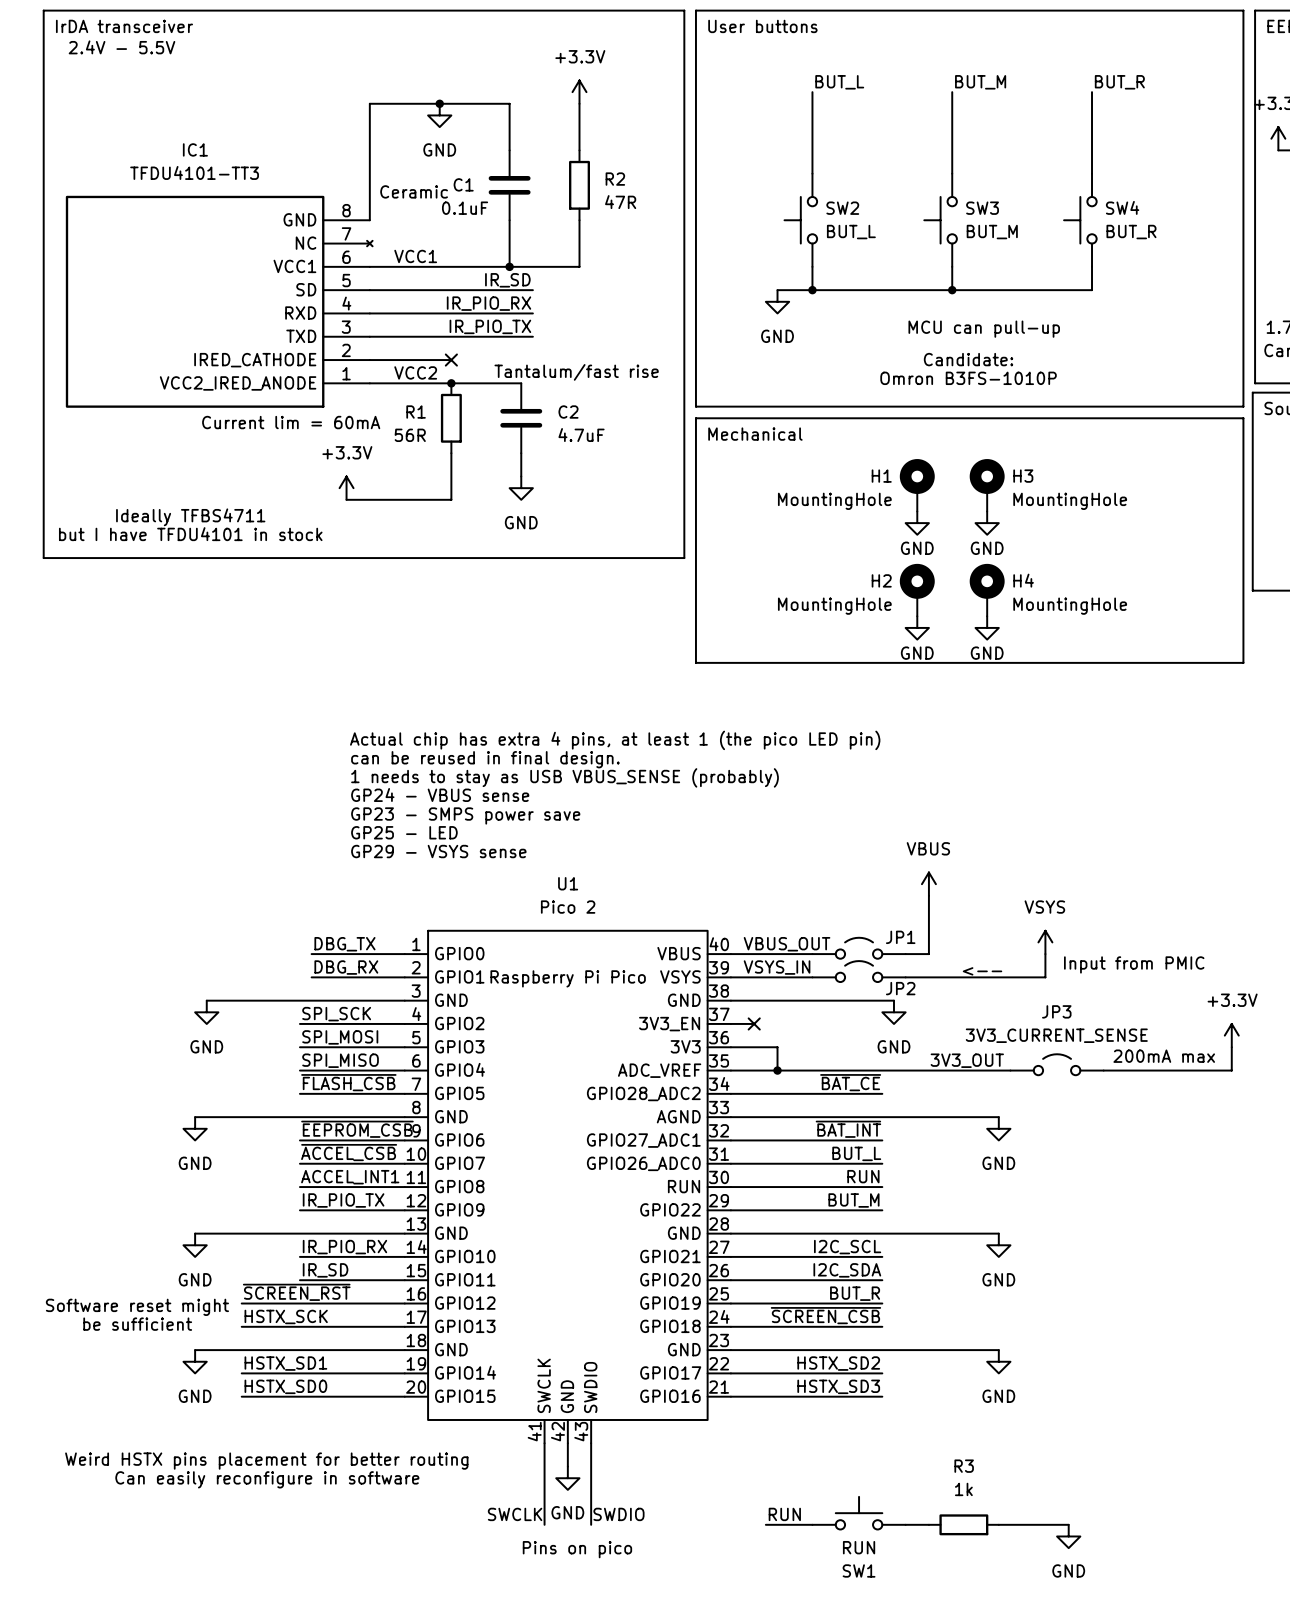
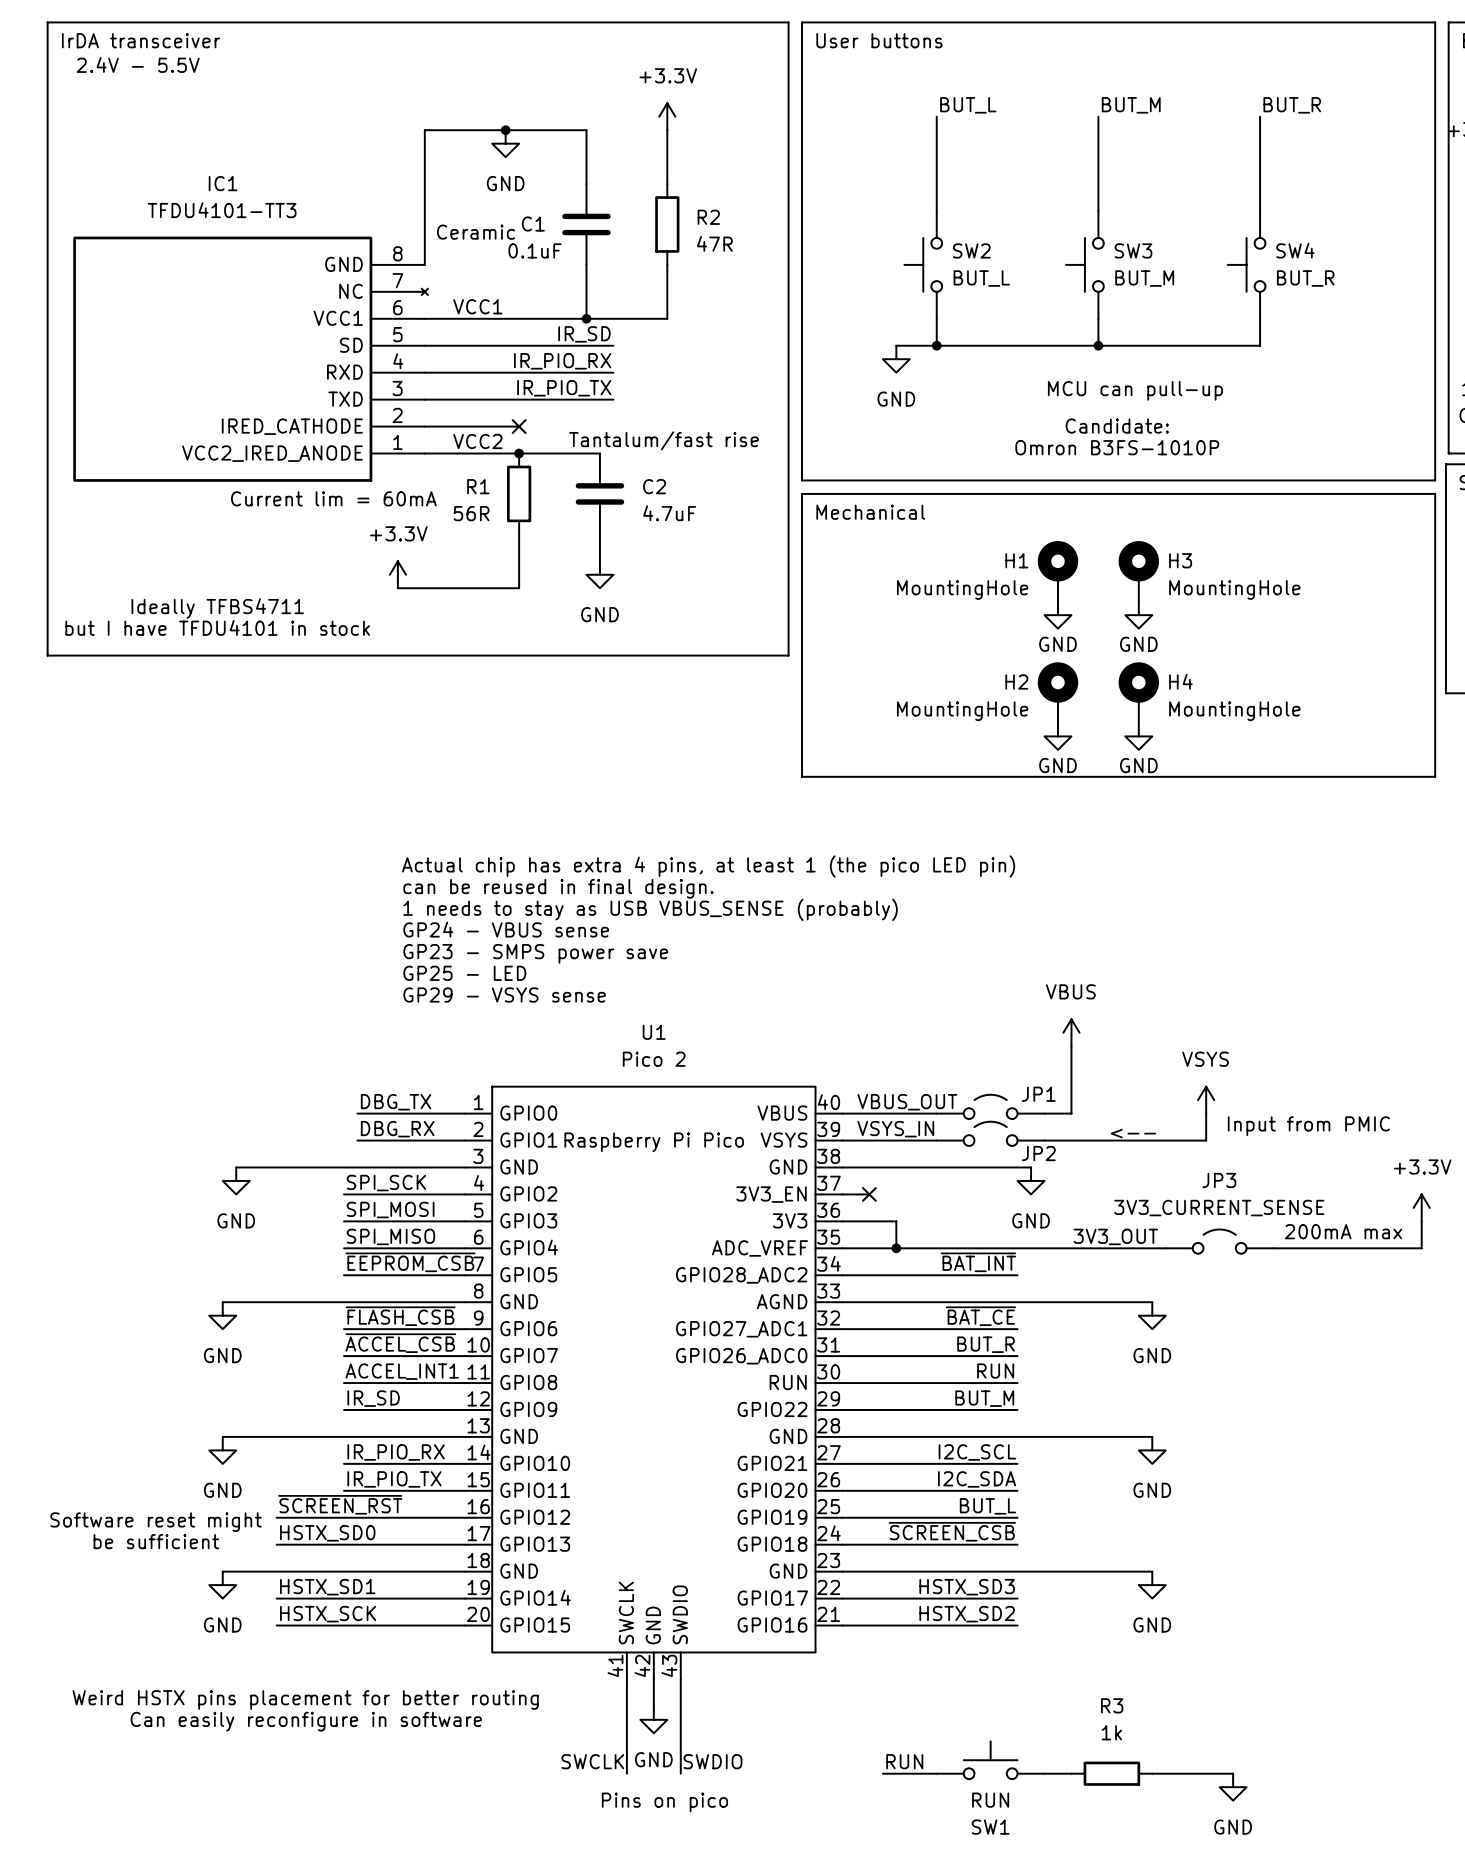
label: ~{FLASH_CSB} (348, 1082) -> ~{EEPROM_CSB} (410, 1262)
label: ~{BAT_CE} (850, 1082) -> ~{BAT_INT} (978, 1262)
label: ~{EEPROM_CSB} (357, 1129) -> ~{FLASH_CSB} (400, 1316)
label: ~{BAT_INT} (848, 1129) -> ~{BAT_CE} (980, 1316)
label: BUT_L (856, 1153) -> BUT_R (986, 1344)
label: IR_PIO_TX (343, 1200) -> IR_SD (373, 1398)
label: IR_SD (325, 1270) -> IR_PIO_TX (394, 1479)
label: BUT_R (855, 1293) -> BUT_L (987, 1506)
label: HSTX_SCK (286, 1316) -> HSTX_SD0 (327, 1533)
label: HSTX_SD2 (838, 1363) -> HSTX_SD3 (967, 1587)
label: HSTX_SD0 (285, 1386) -> HSTX_SCK (328, 1614)
label: HSTX_SD3 (838, 1386) -> HSTX_SD2 (967, 1614)

